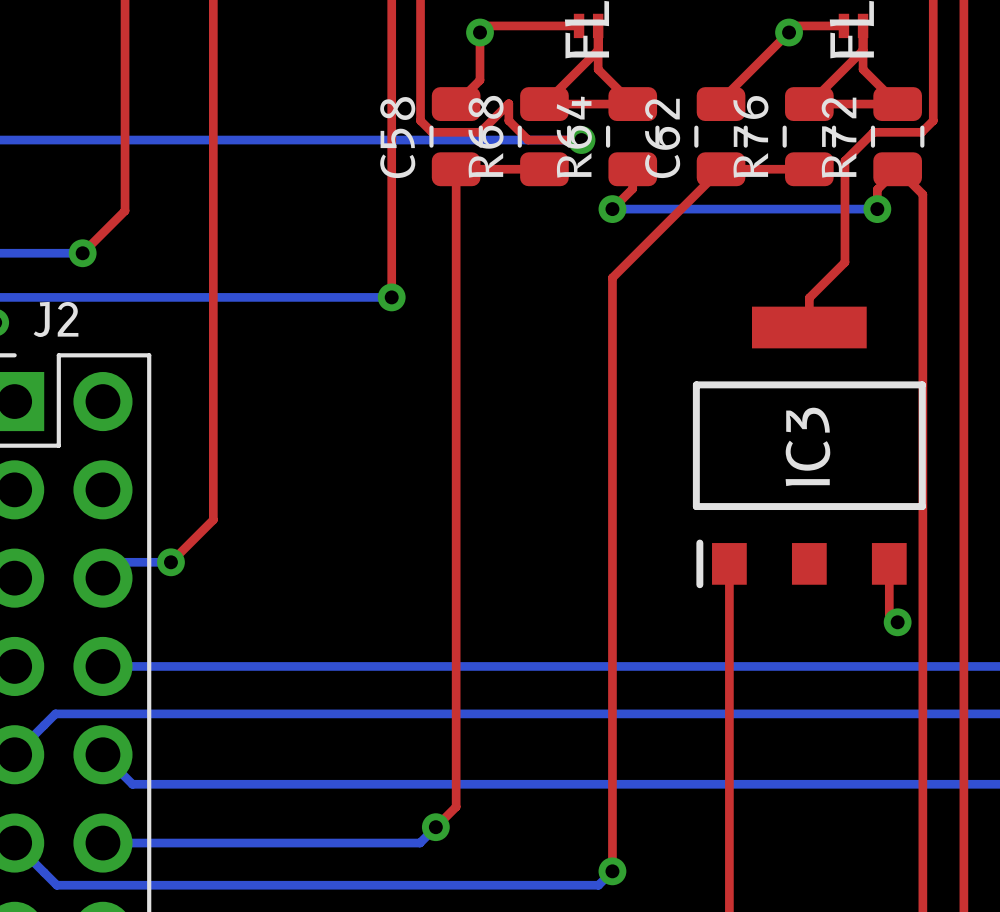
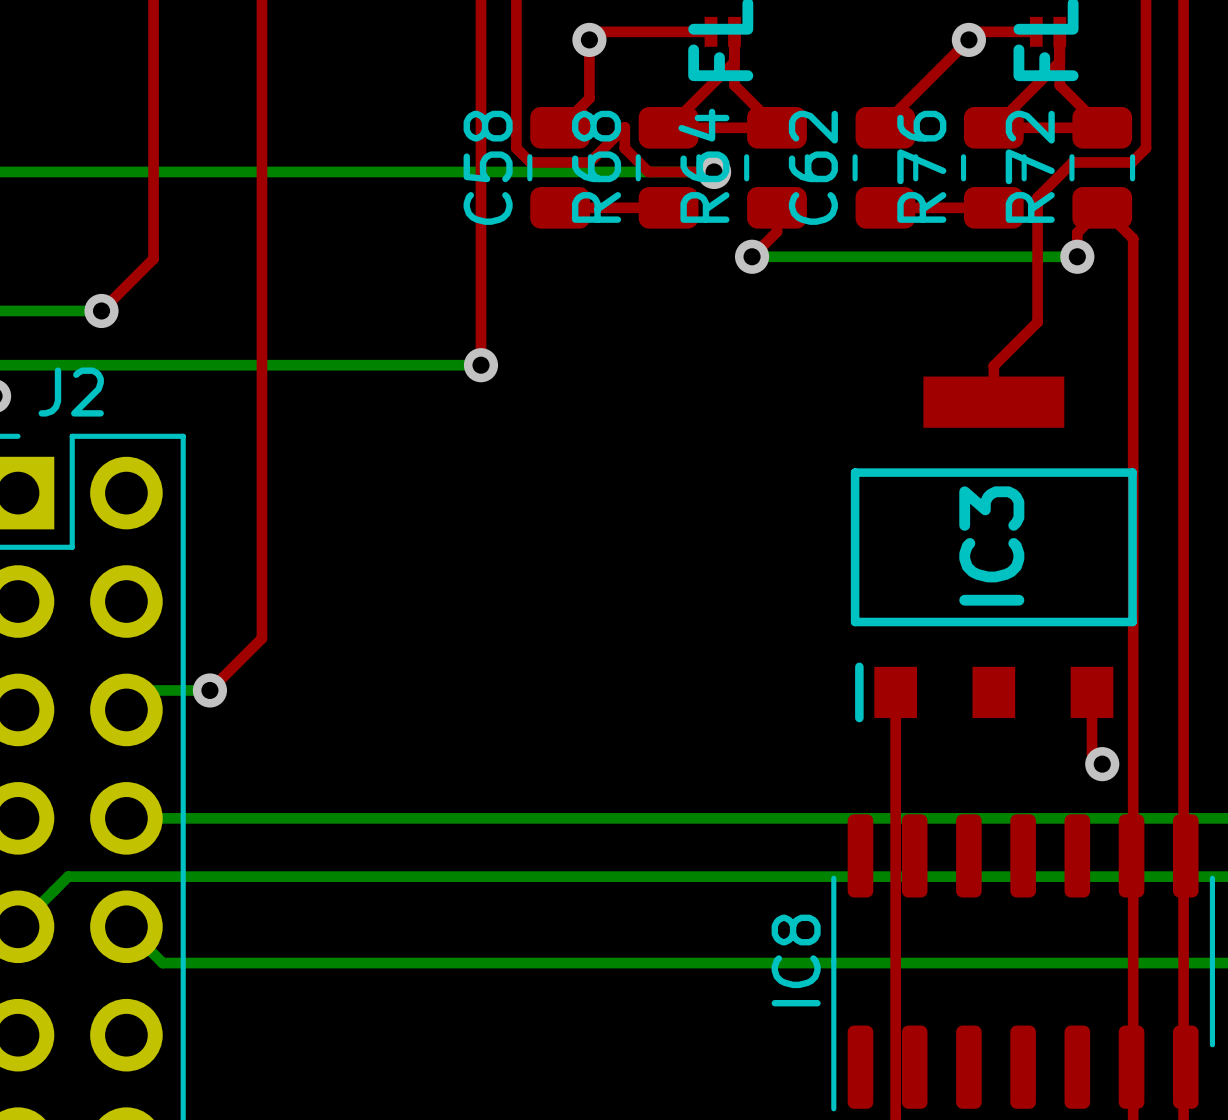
top track: (456, 169) (456, 806) (435, 827) -> none
top track: (721, 169) (612, 277) (612, 871) -> none
IC8: none -> (1023, 962)
bottom track: (435, 827) (420, 843) (102, 843) -> none
via: (435, 827) -> none
bottom track: (14, 843) (56, 885) (598, 885) (612, 871) -> none
via: (612, 871) -> none

